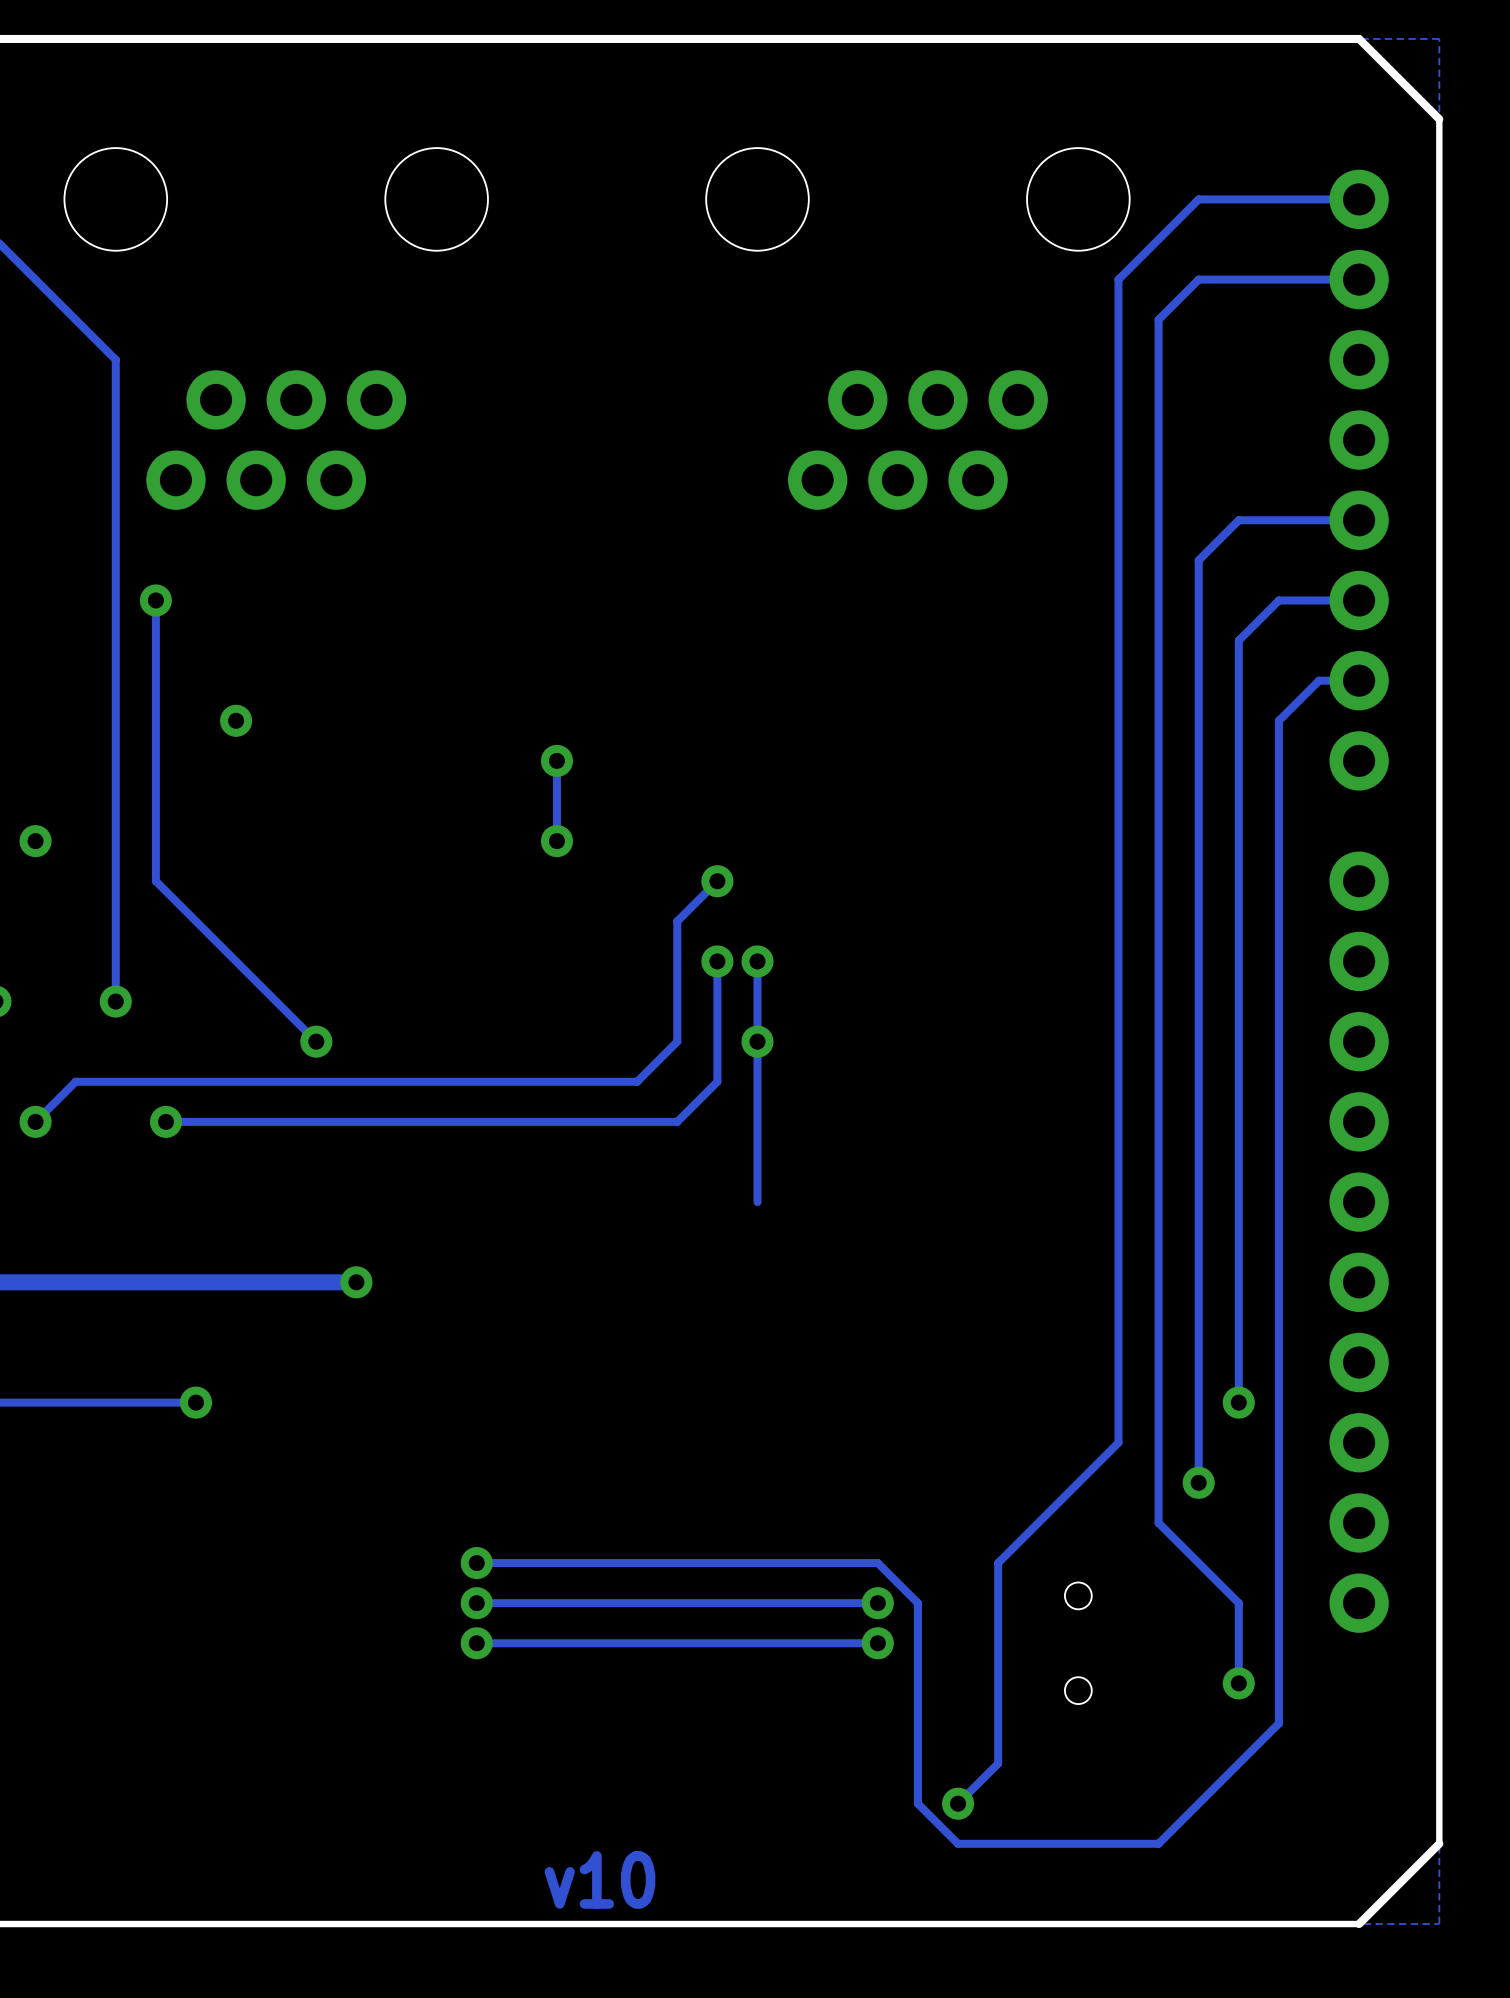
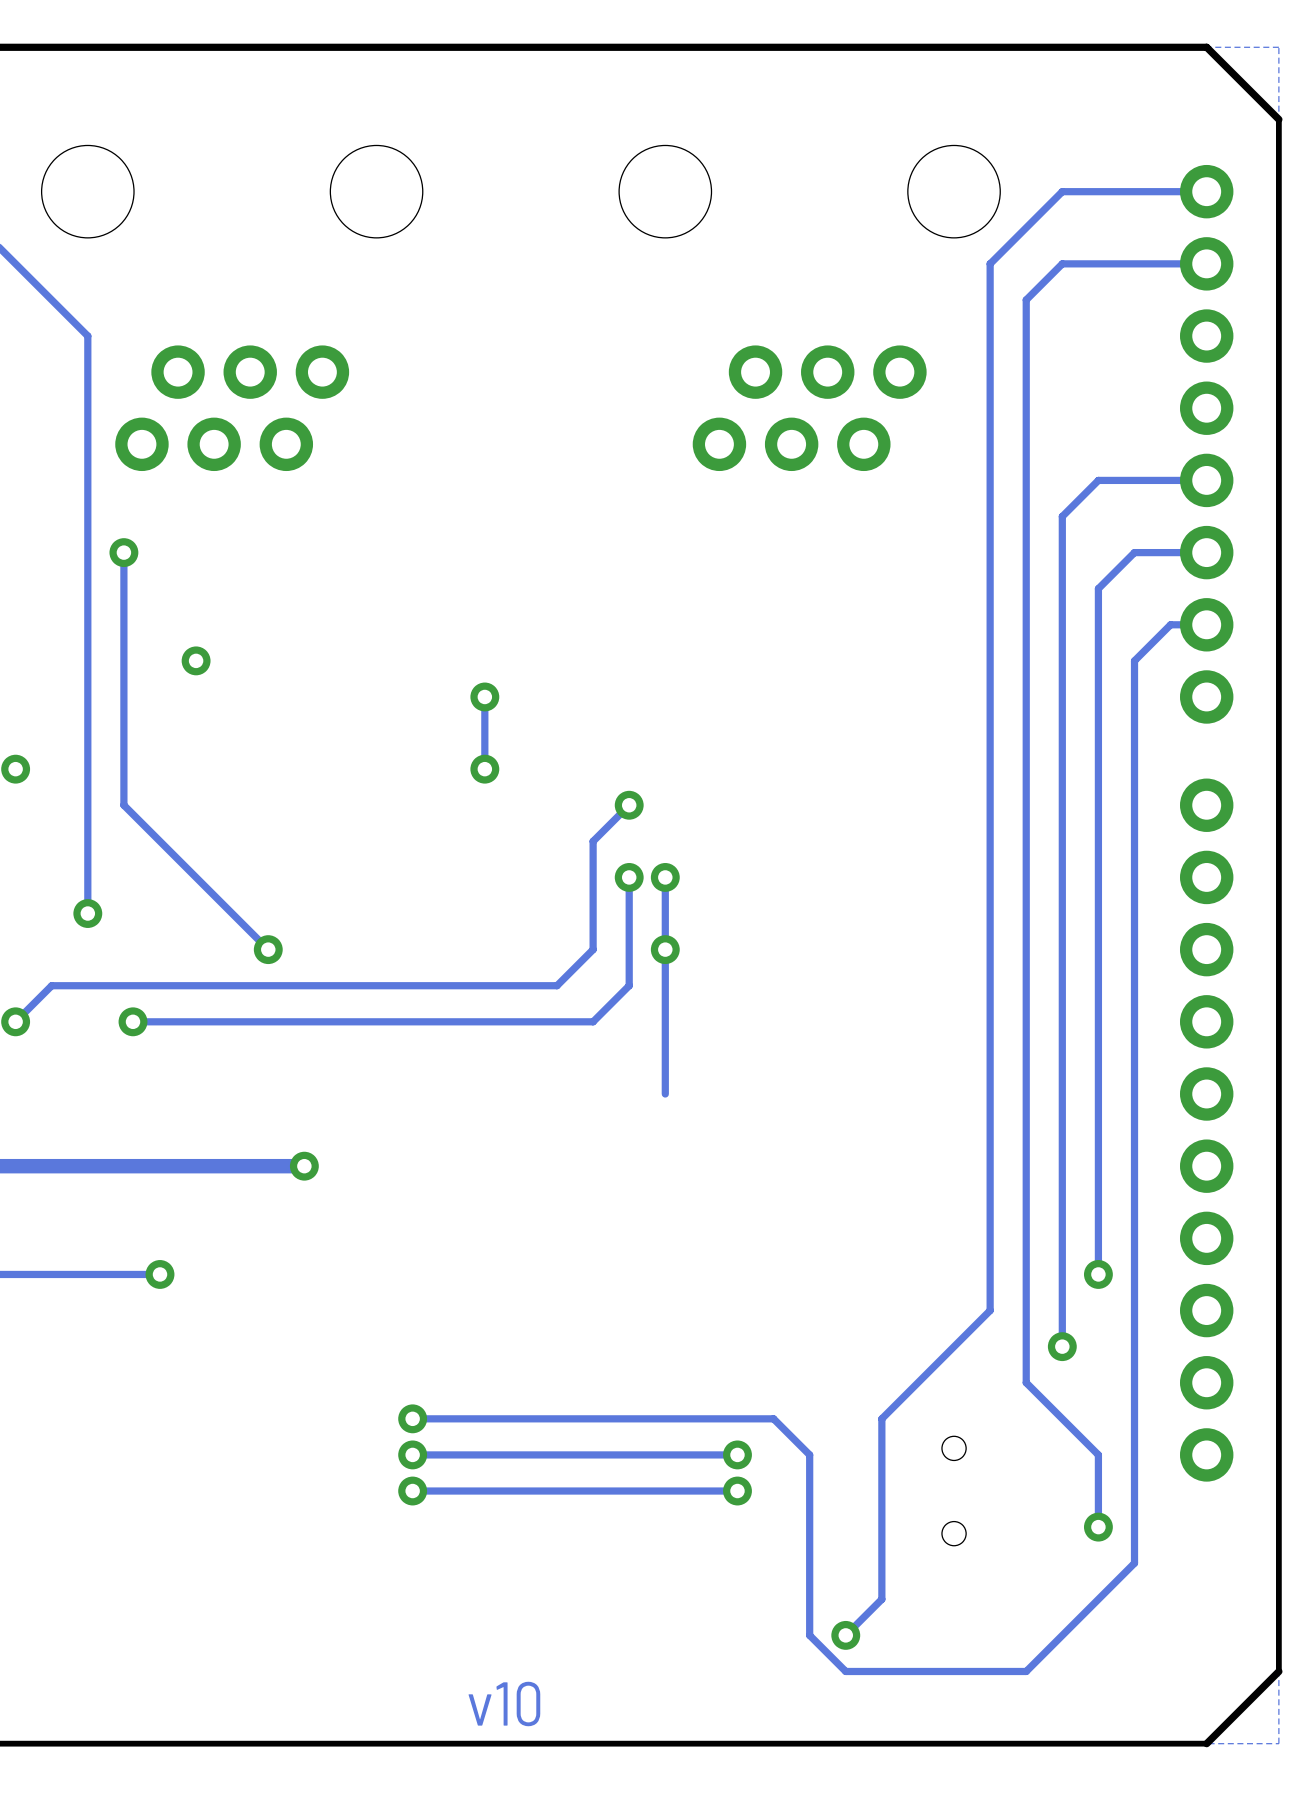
via: none -> (737, 1454)
track: (877, 1603) (837, 1603) -> none
via: (877, 1603) -> none
via: none -> (737, 1491)
track: (877, 1643) (837, 1643) -> none
via: (877, 1643) -> none

